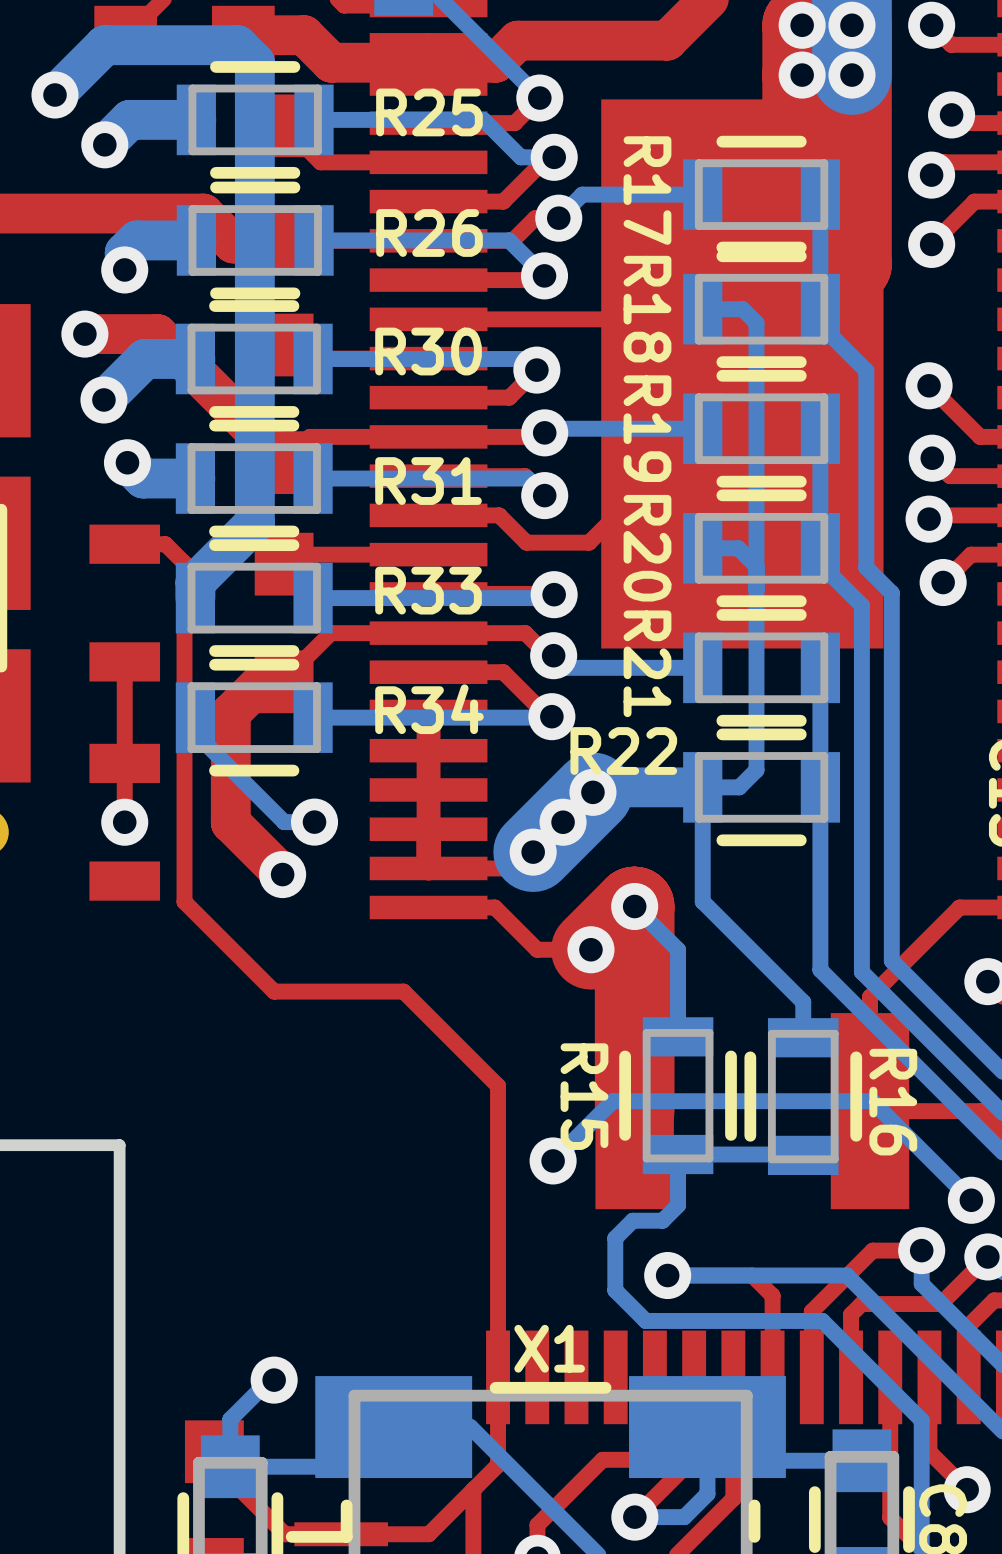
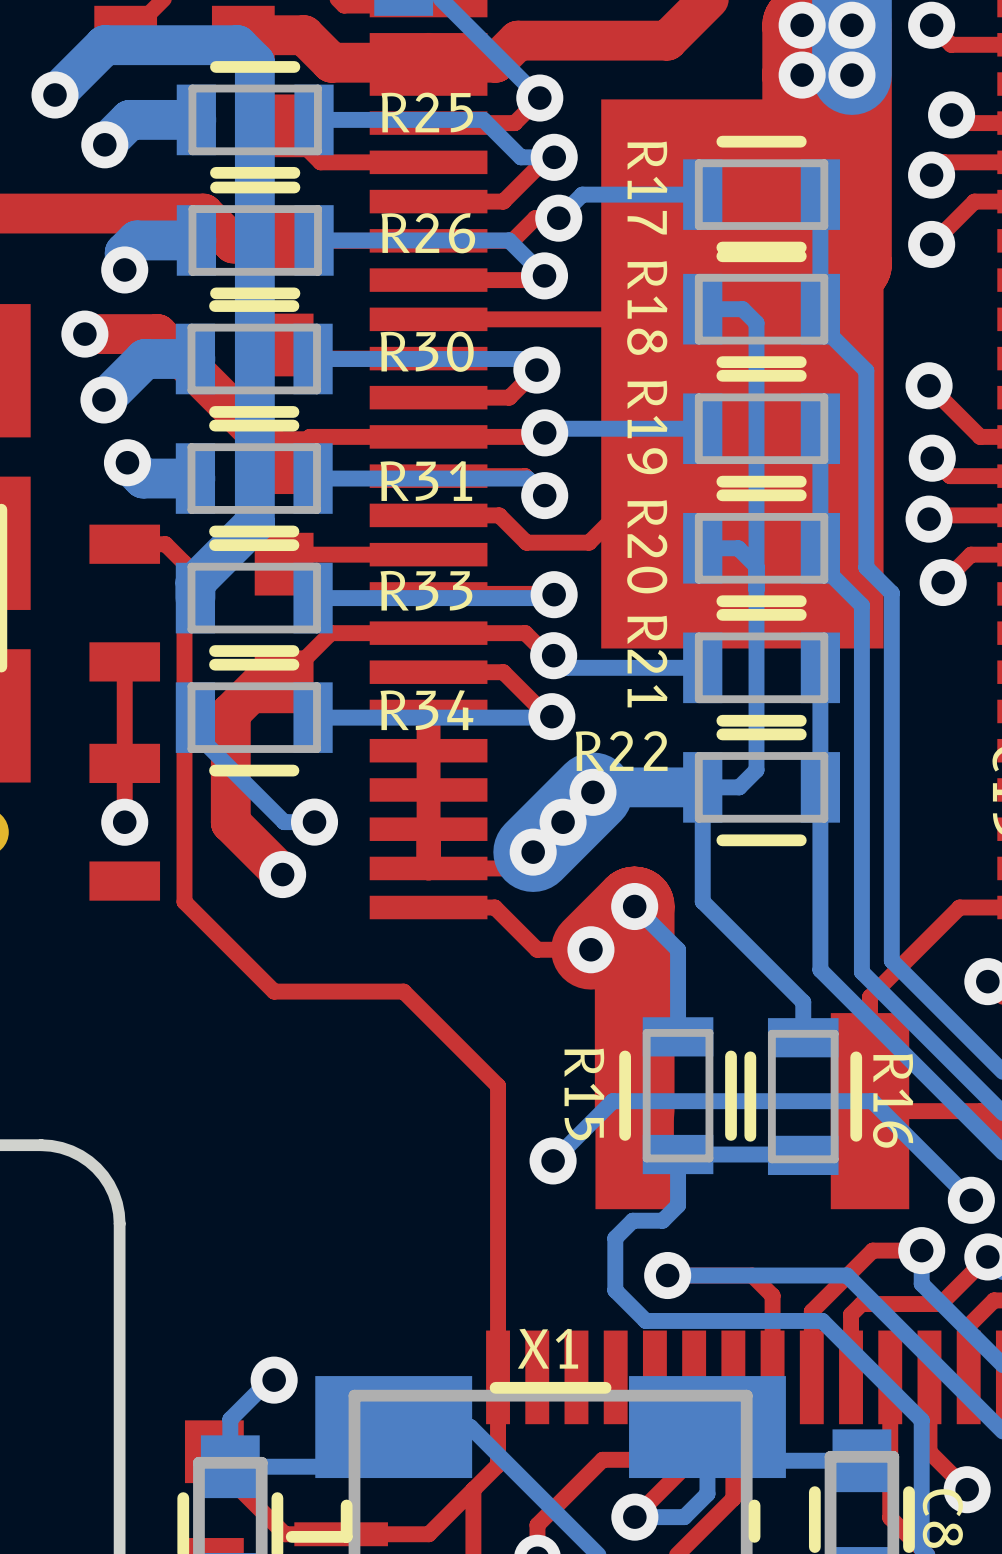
board edge: (41, 1145) (119, 1145) (119, 1223) -> (41, 1145) (71, 1151) (96, 1168) (113, 1193) (119, 1223)

